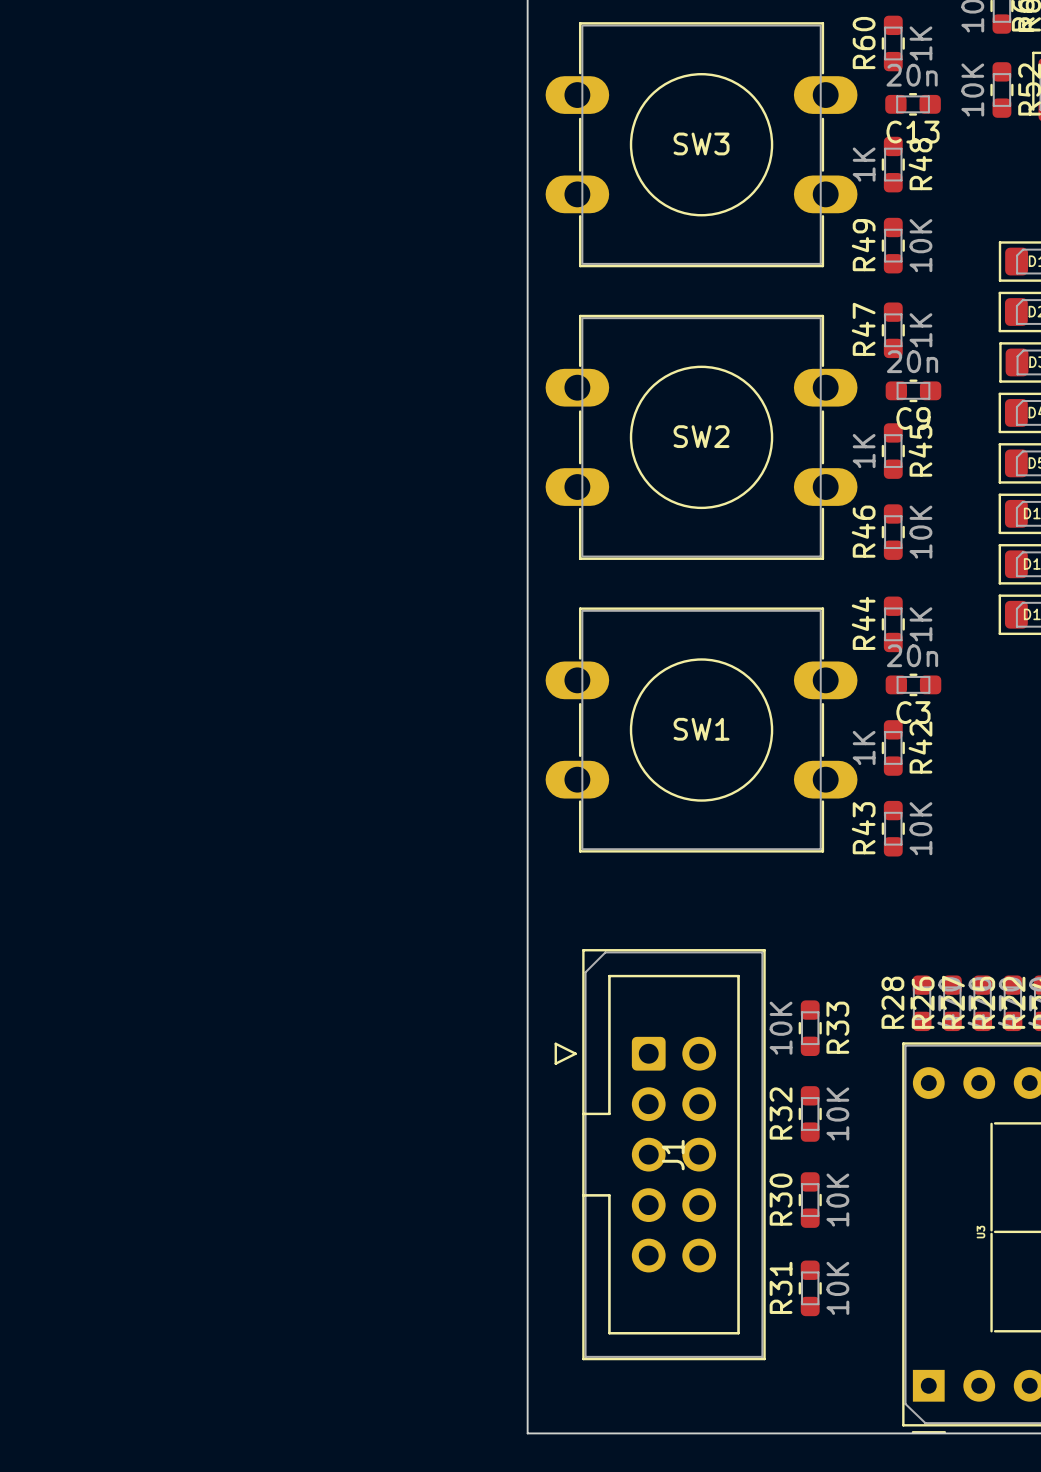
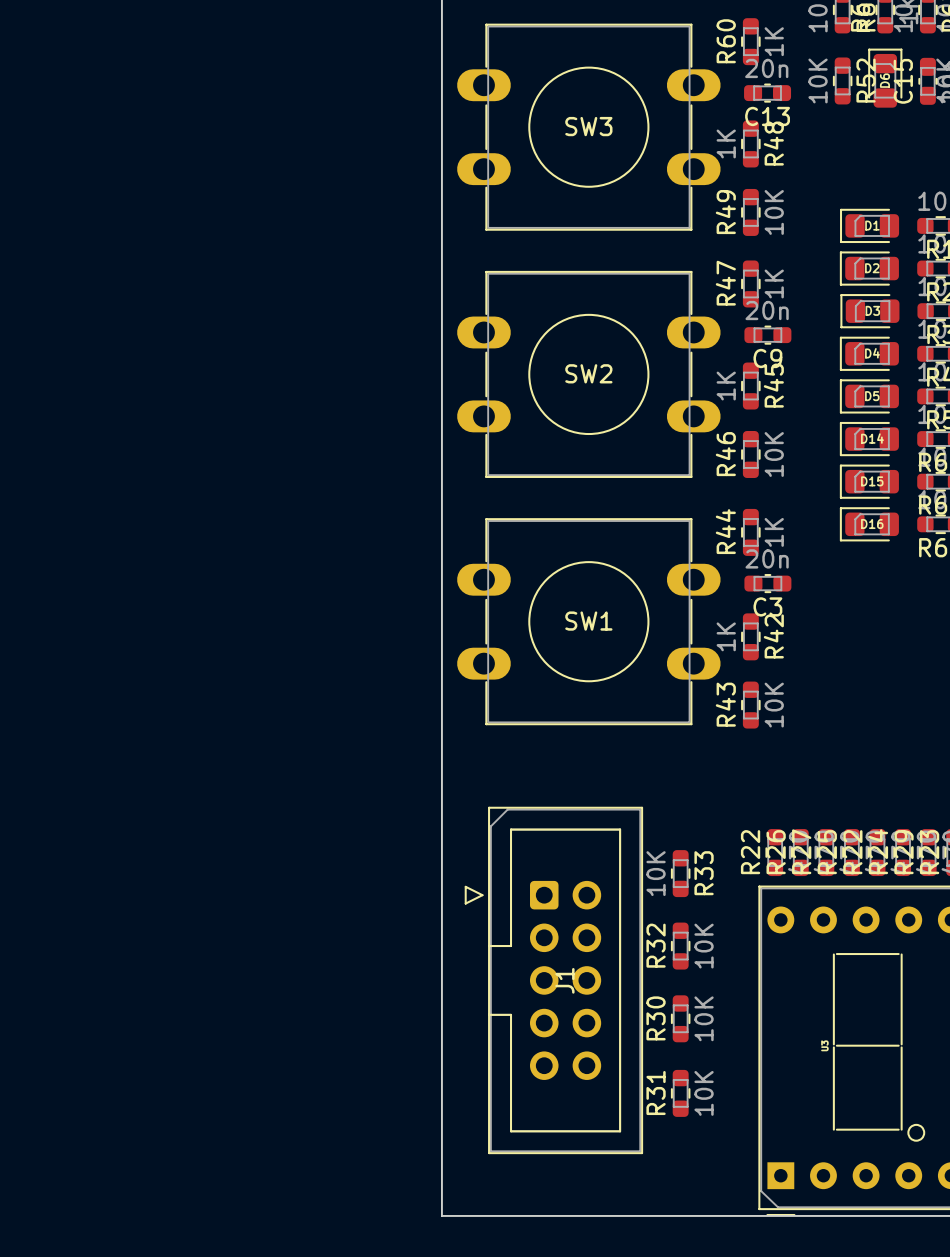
R28 name: R28 (892, 1002) -> R22 (750, 852)

